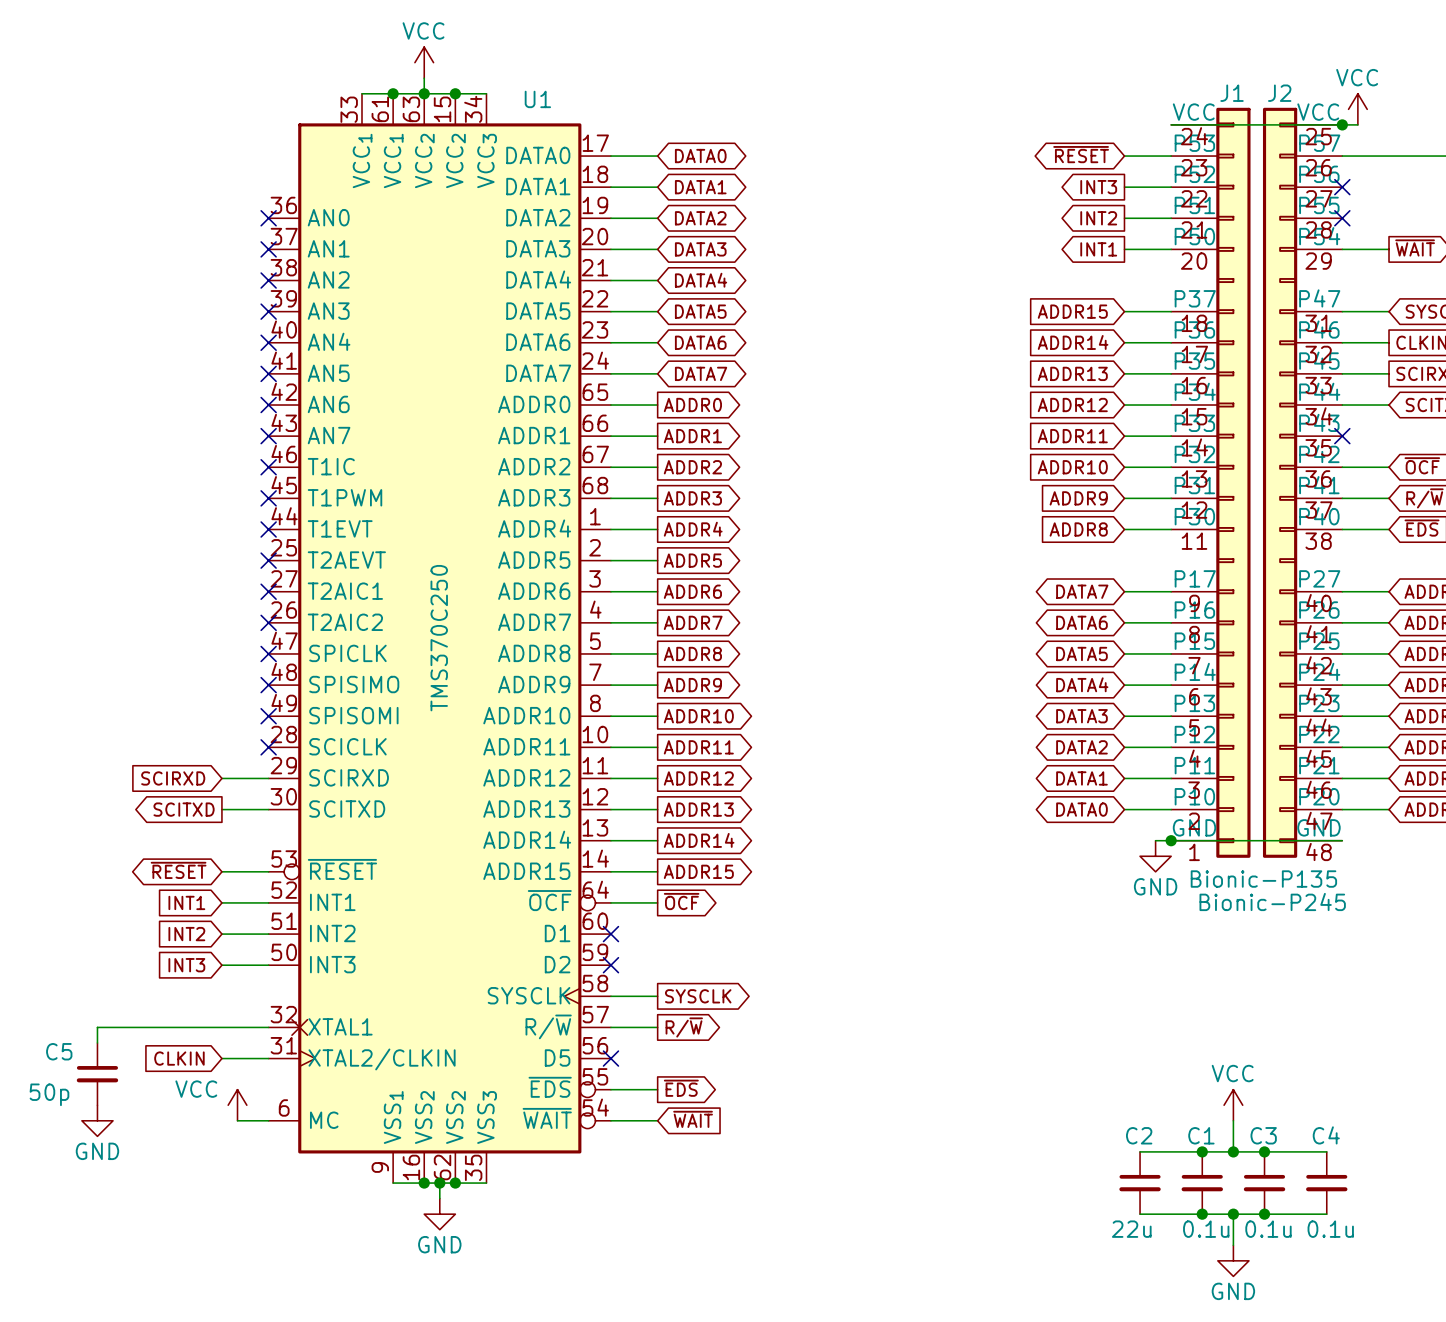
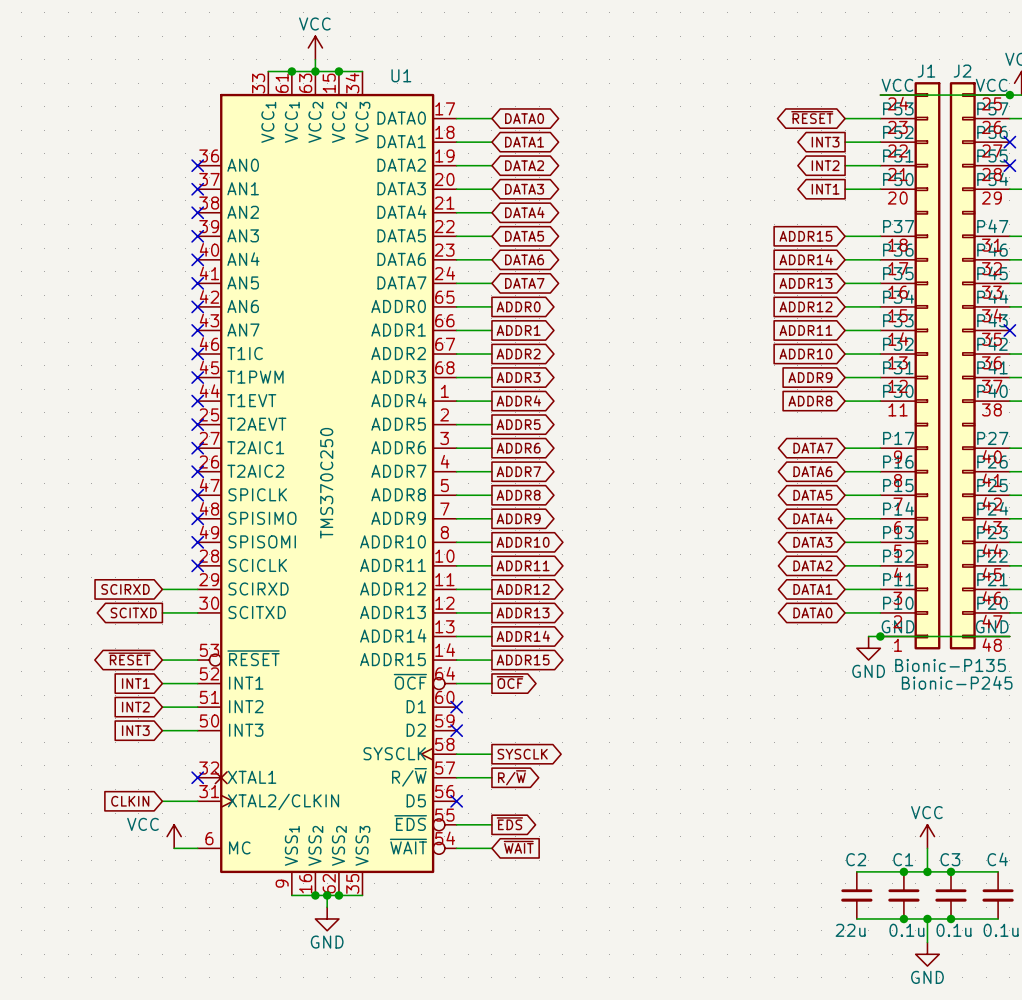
wire: (268, 1027) (97, 1027) (97, 1043) -> none
no-connect mark: none -> (197, 777)
C5: 50p (97, 1074) -> none
power symbol: GND (97, 1120) -> none

